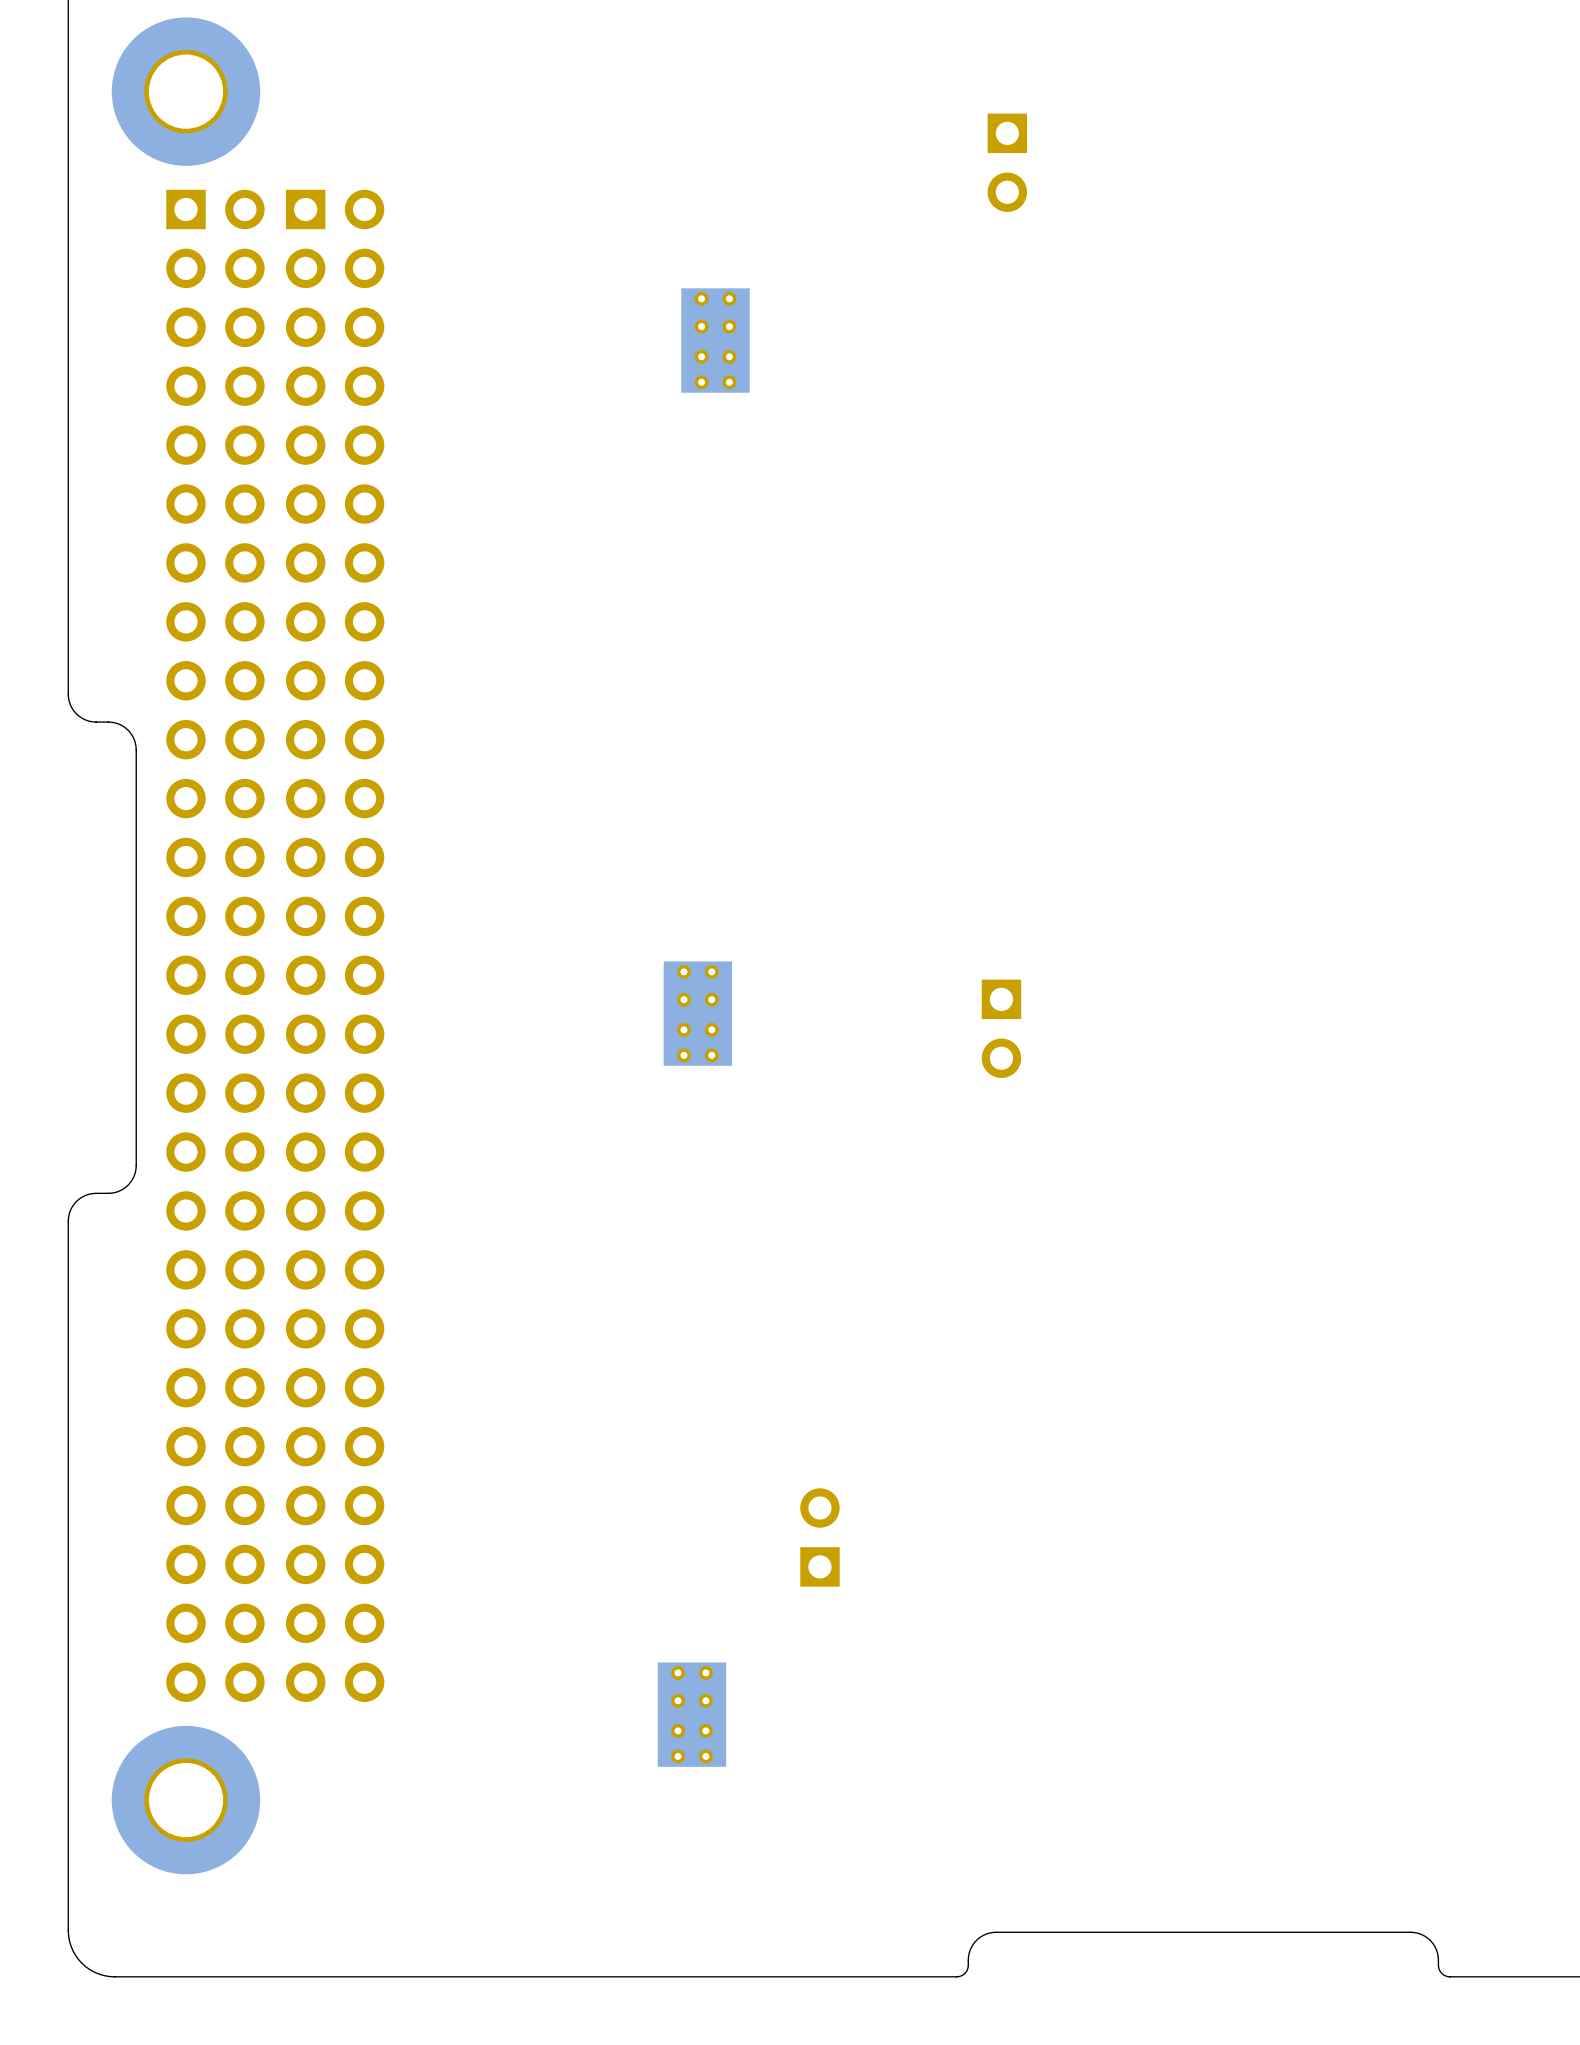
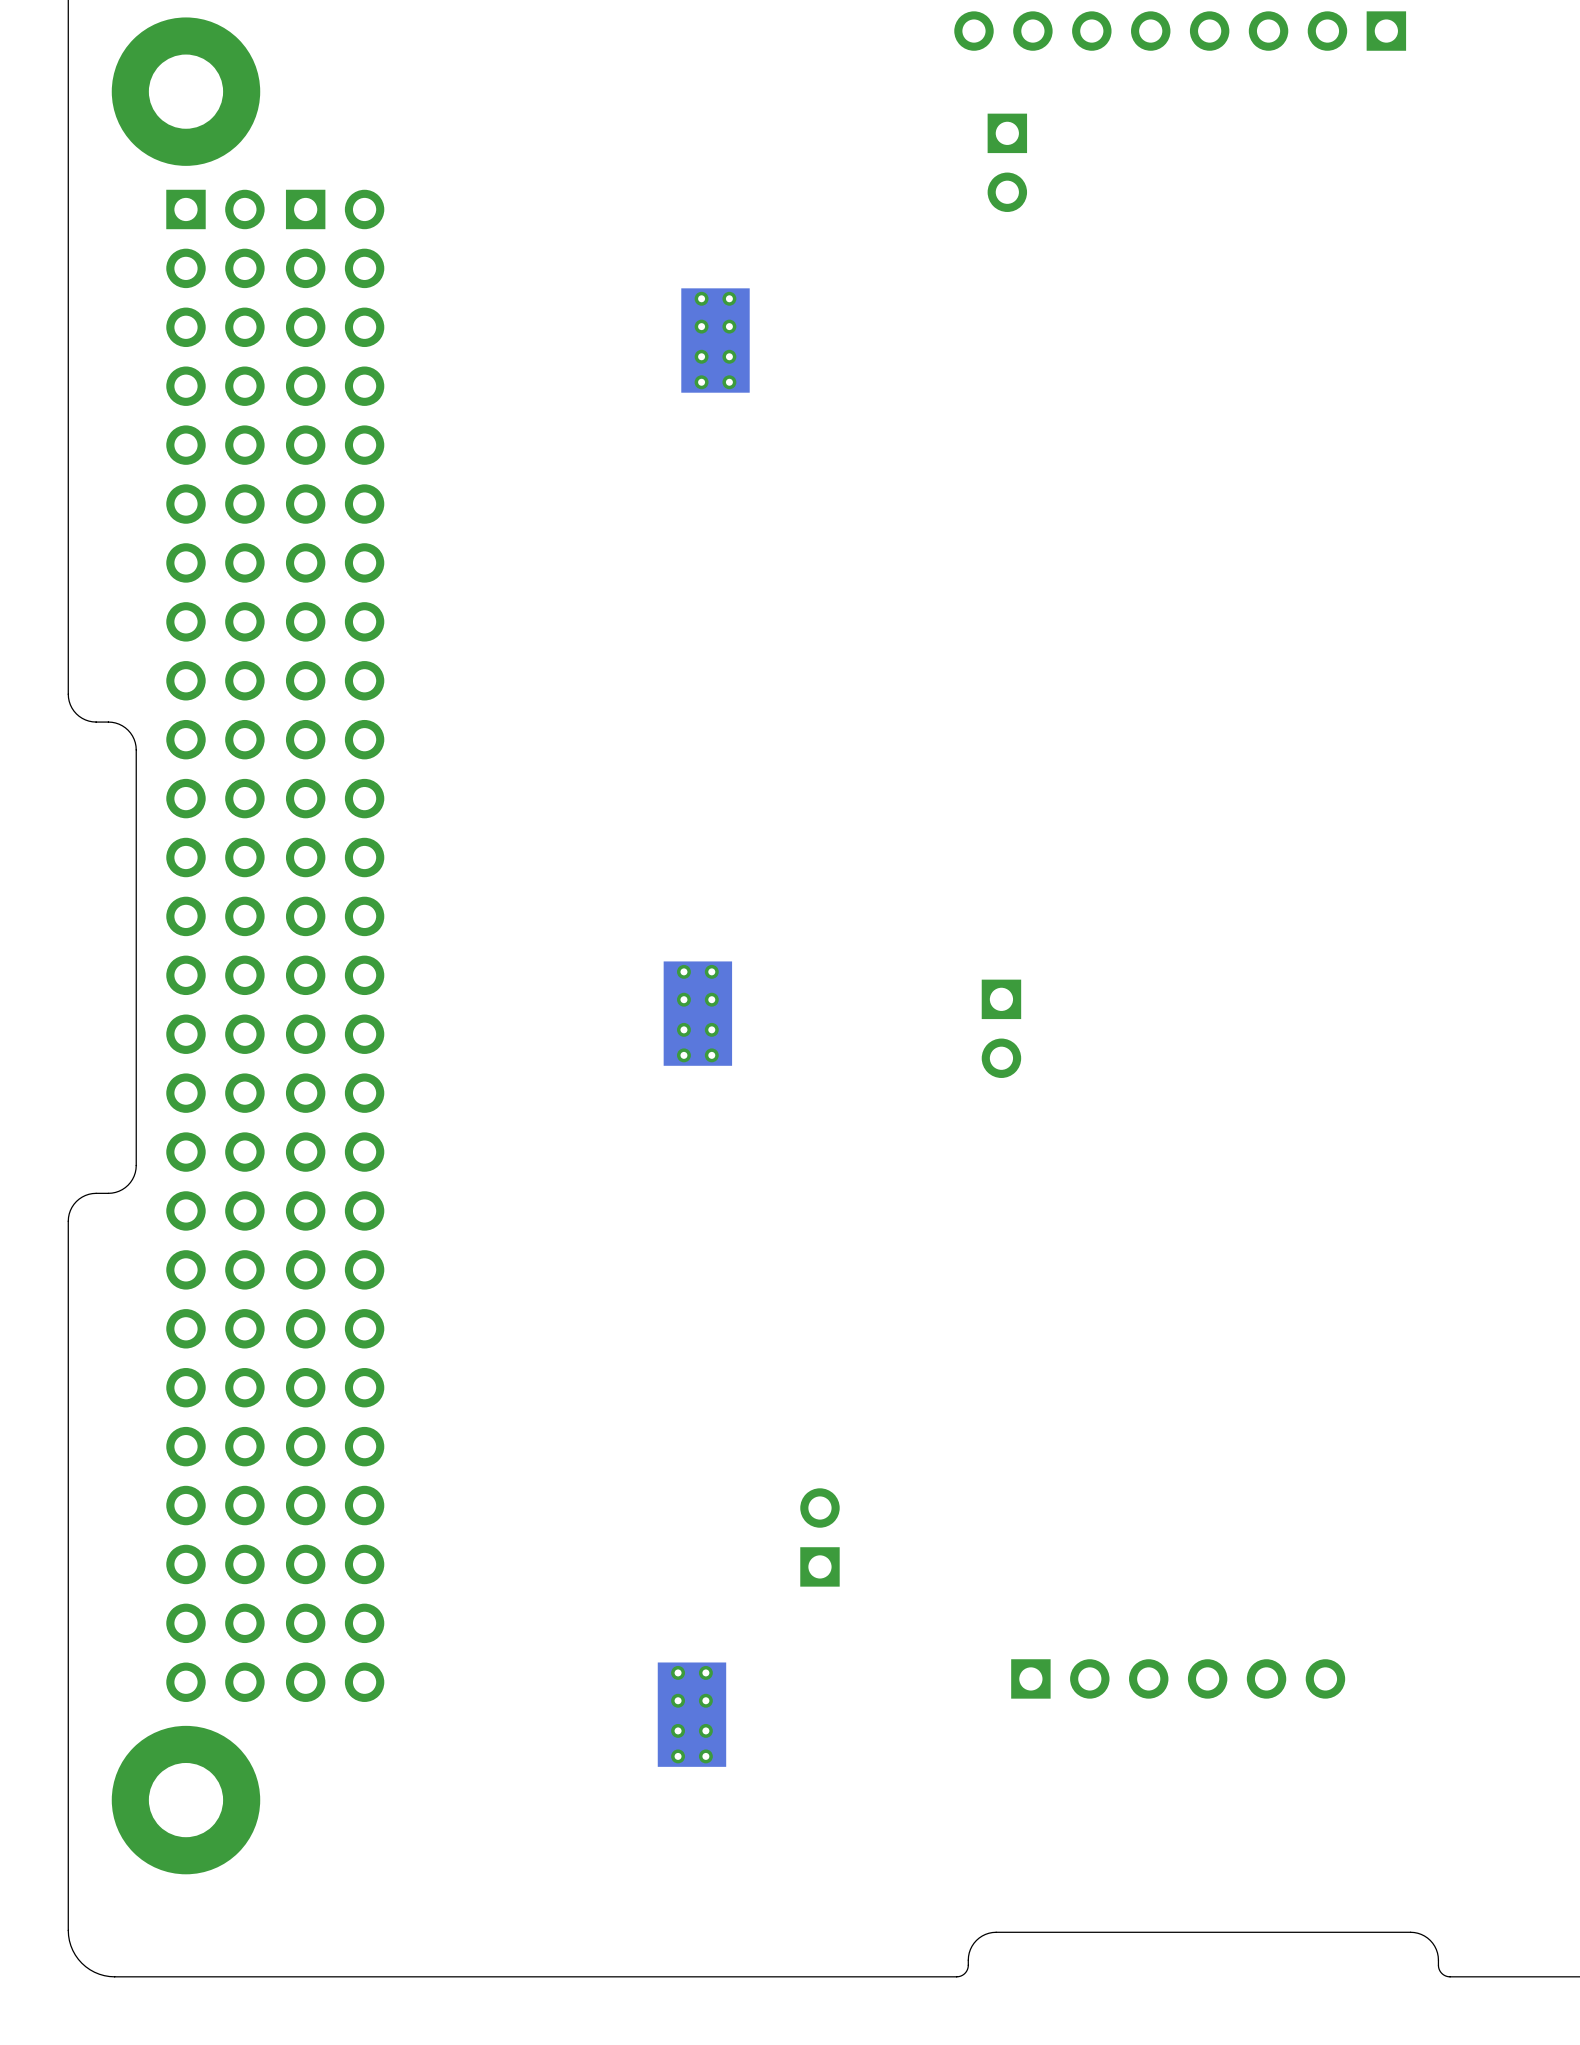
part footprint: [111, 17, 261, 166] -> [111, 17, 261, 166]
part: none -> (1180, 31)
part: none -> (1178, 1678)
part footprint: [111, 1725, 261, 1875] -> [111, 1725, 261, 1875]

